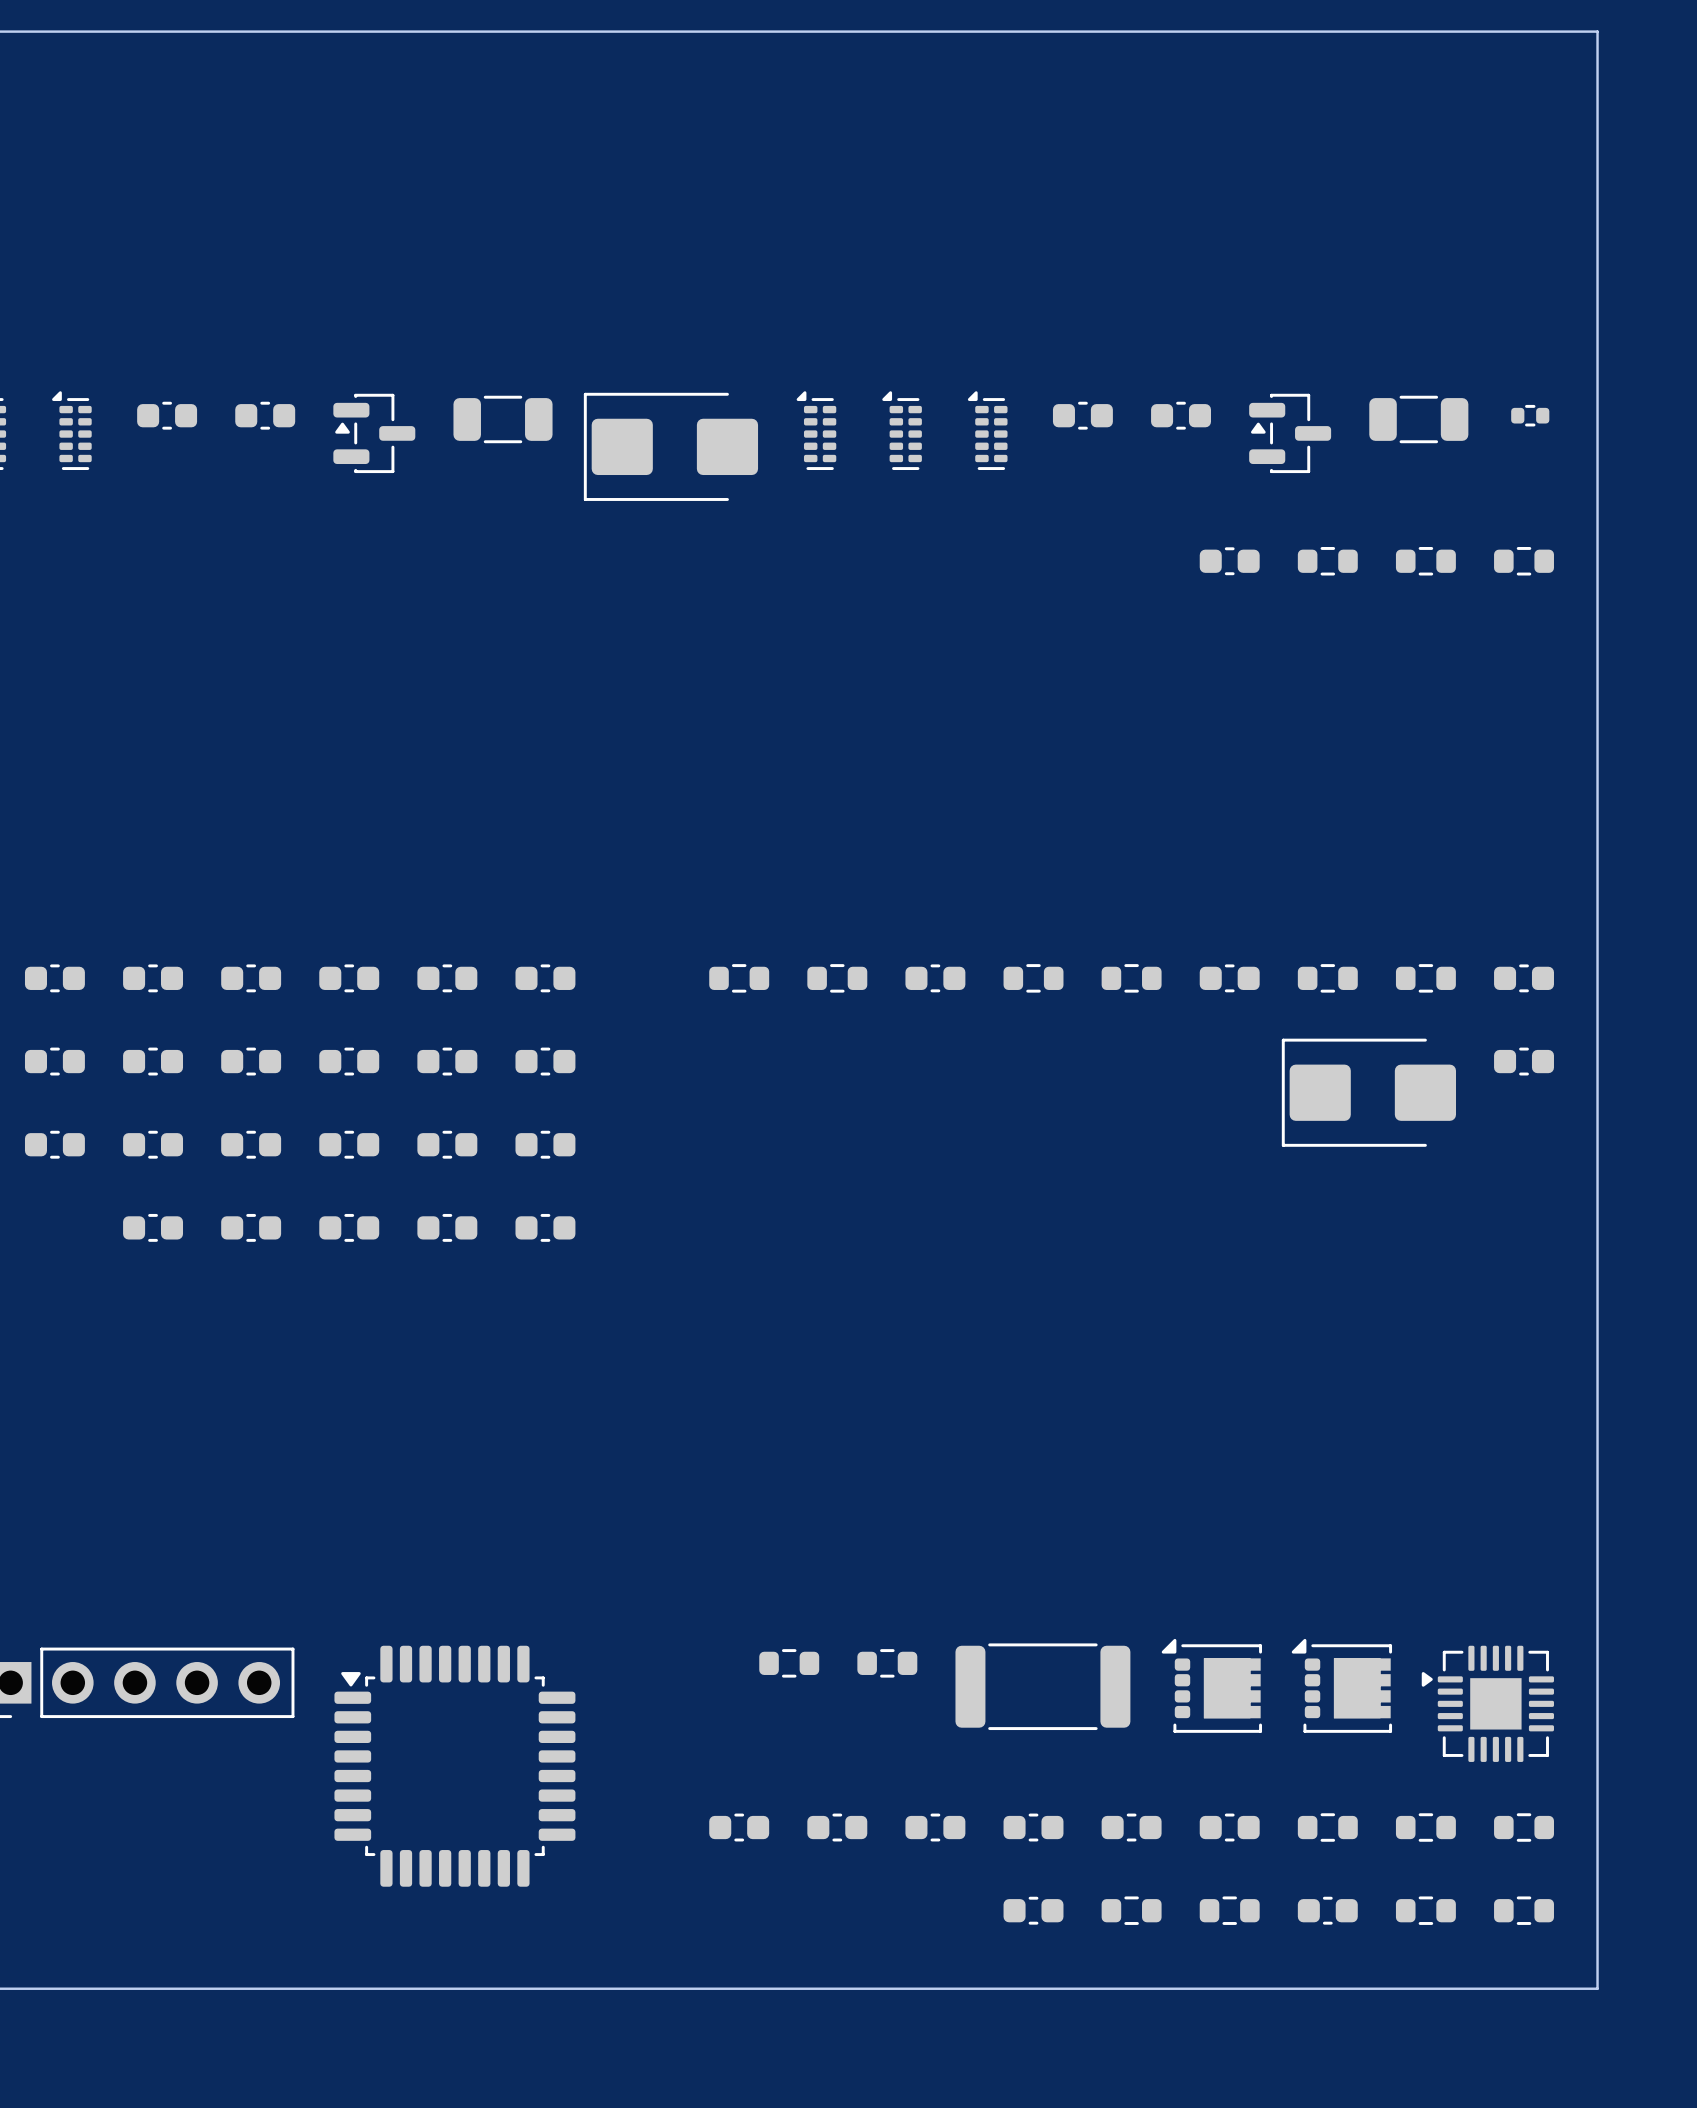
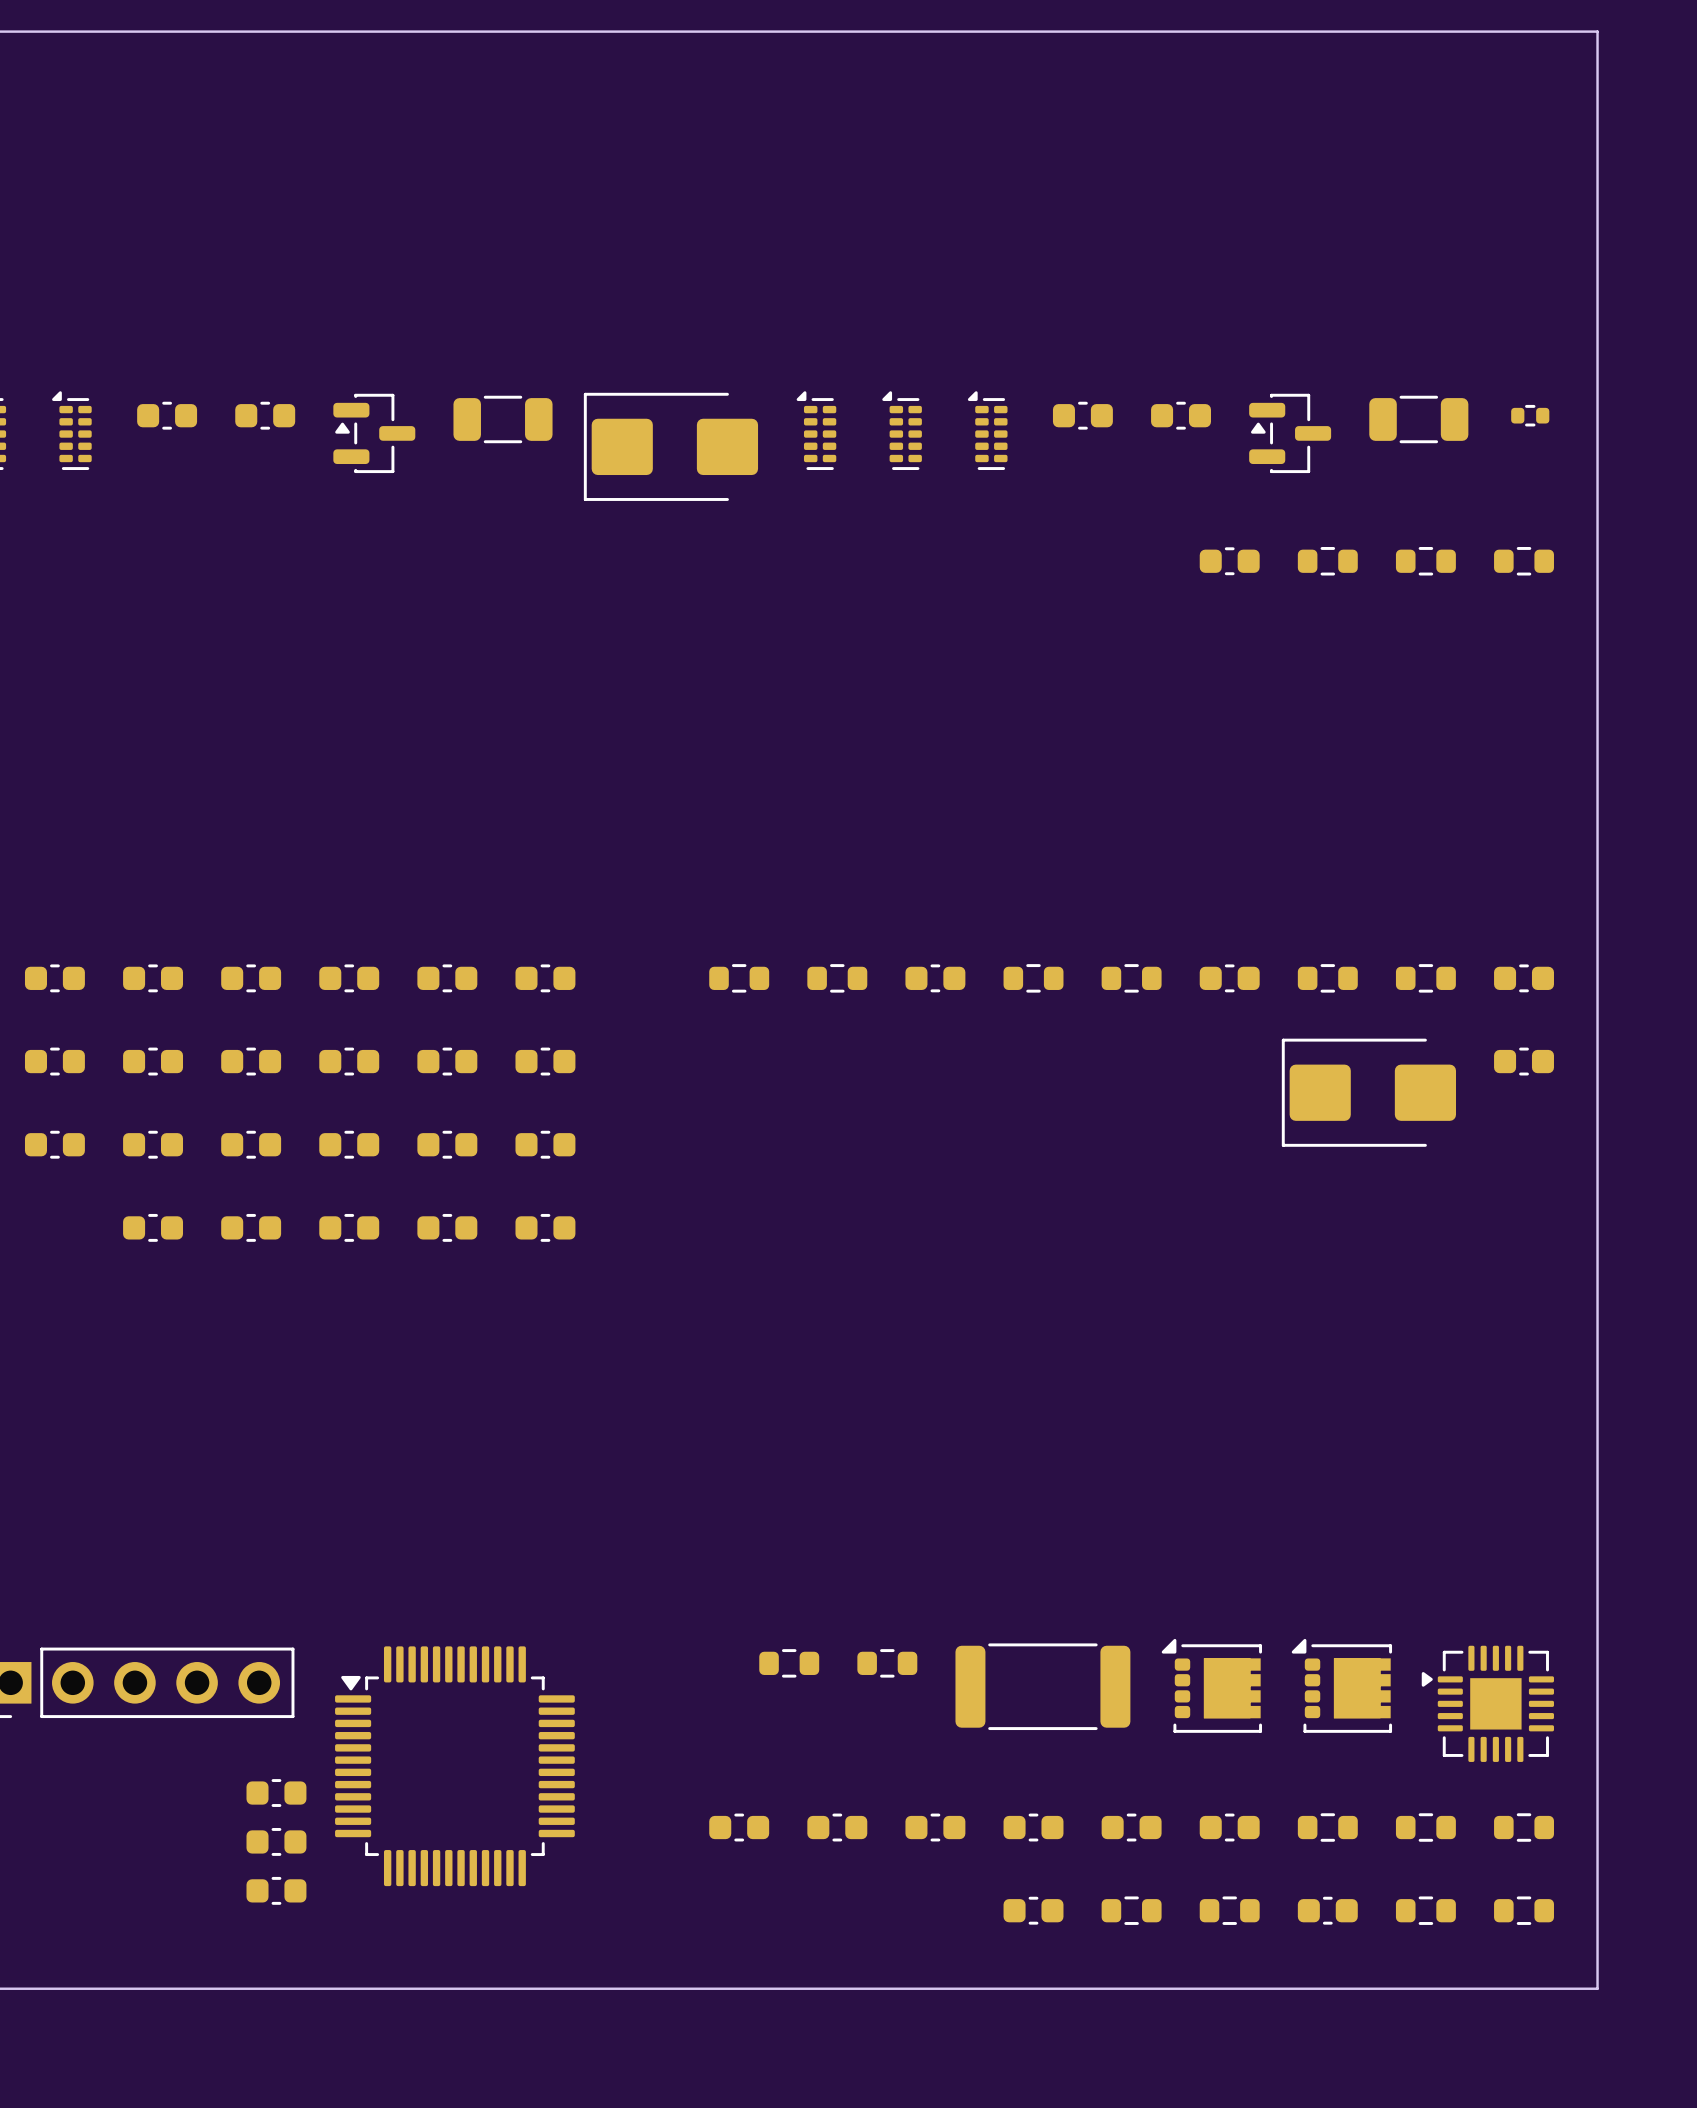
part footprint: [334, 1645, 576, 1887] -> [335, 1646, 575, 1887]
part: none -> (276, 1793)
part: none -> (276, 1841)
part: none -> (276, 1890)

